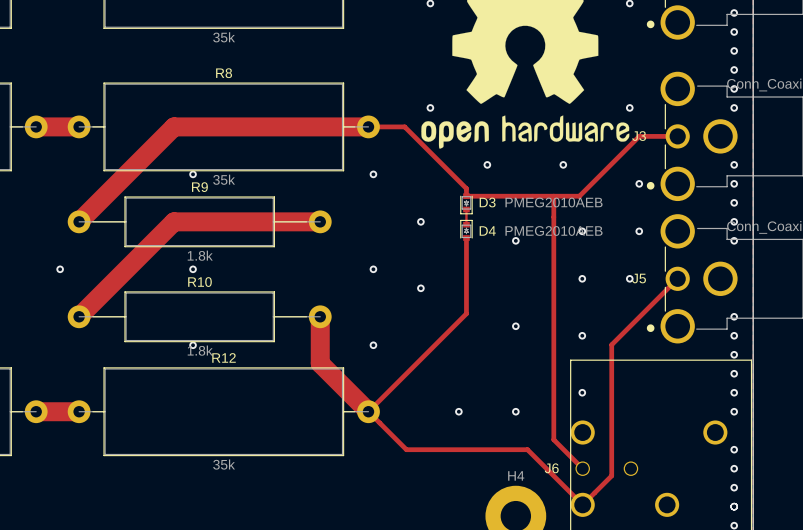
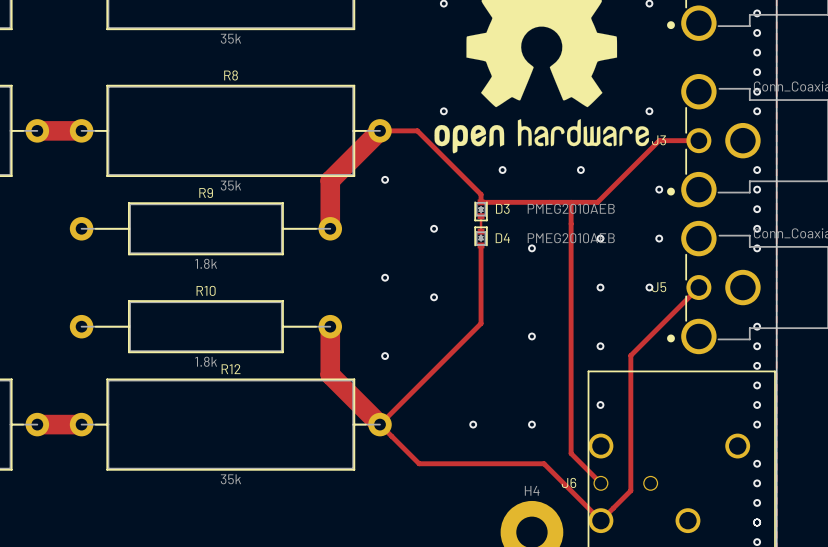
track: (368, 126) (174, 126) (79, 221) -> (380, 130) (330, 180) (330, 228)
via: (193, 174) -> none
track: (320, 221) (174, 221) (79, 316) -> none
via: (60, 269) -> none
via: (193, 269) -> none
via: (193, 345) -> none

